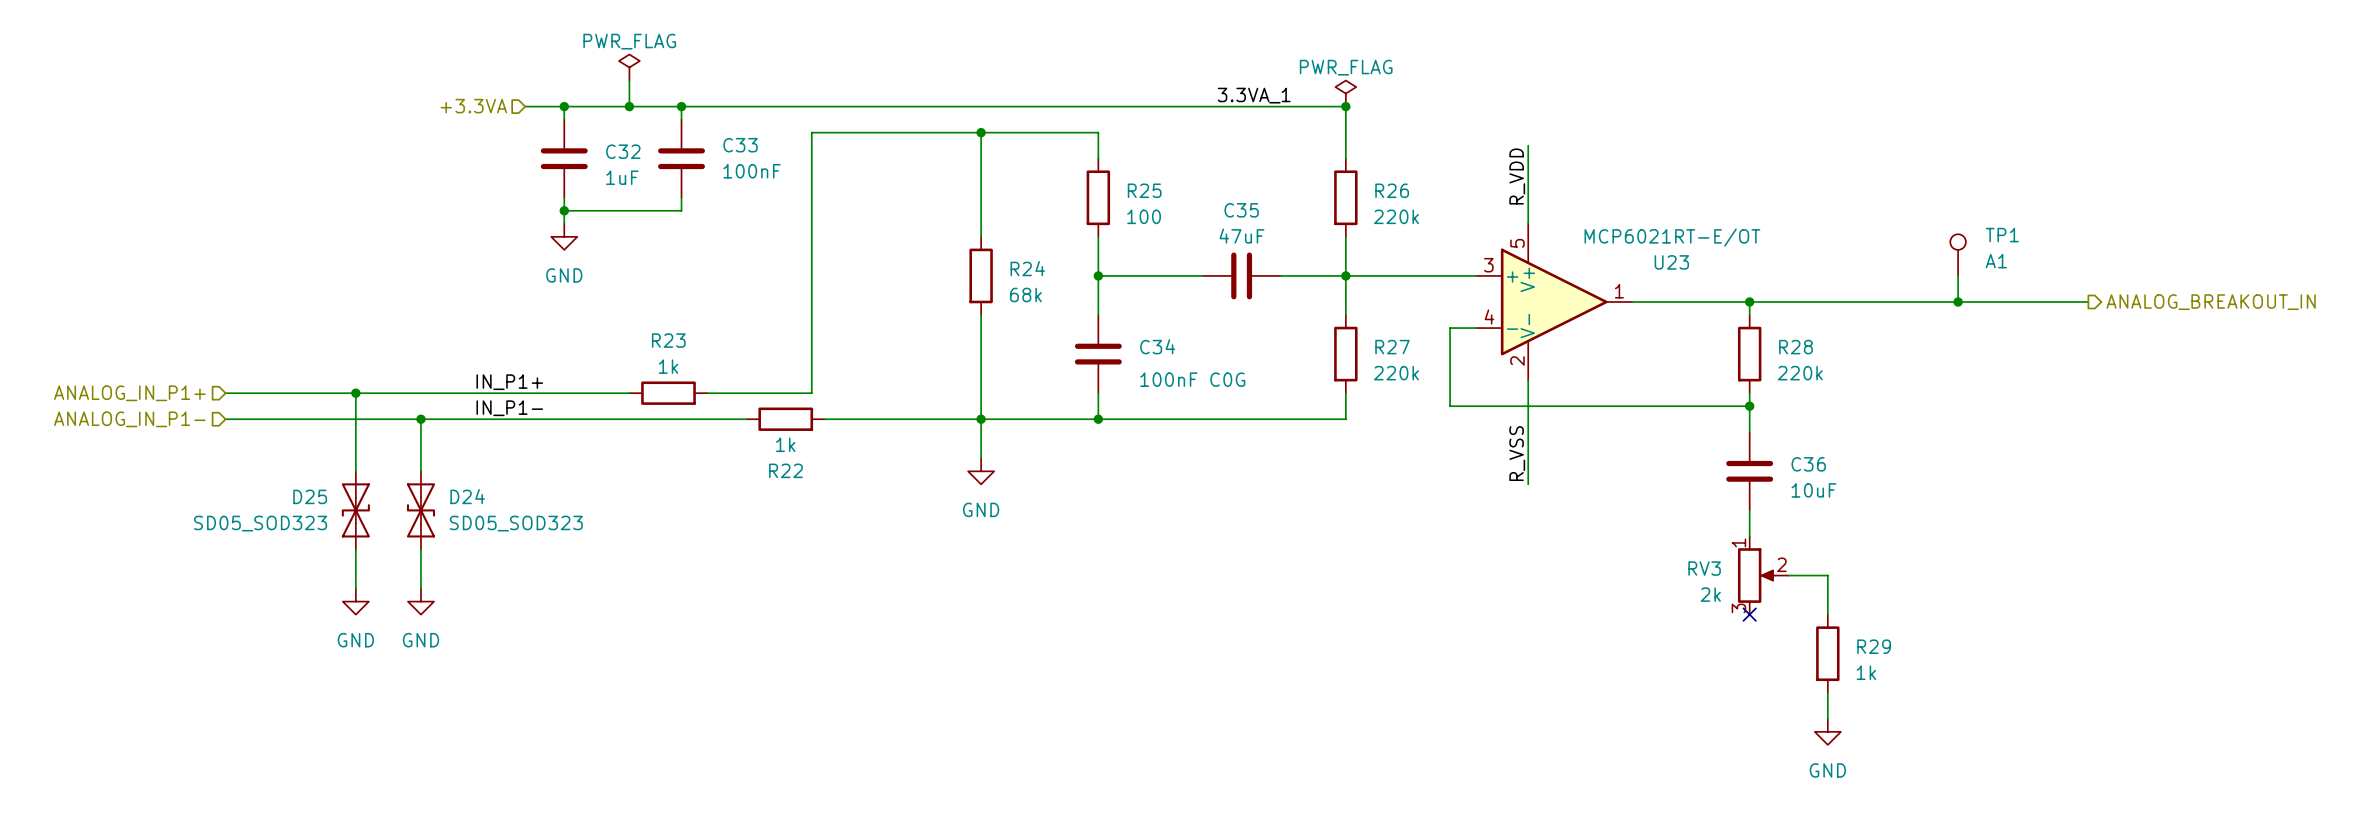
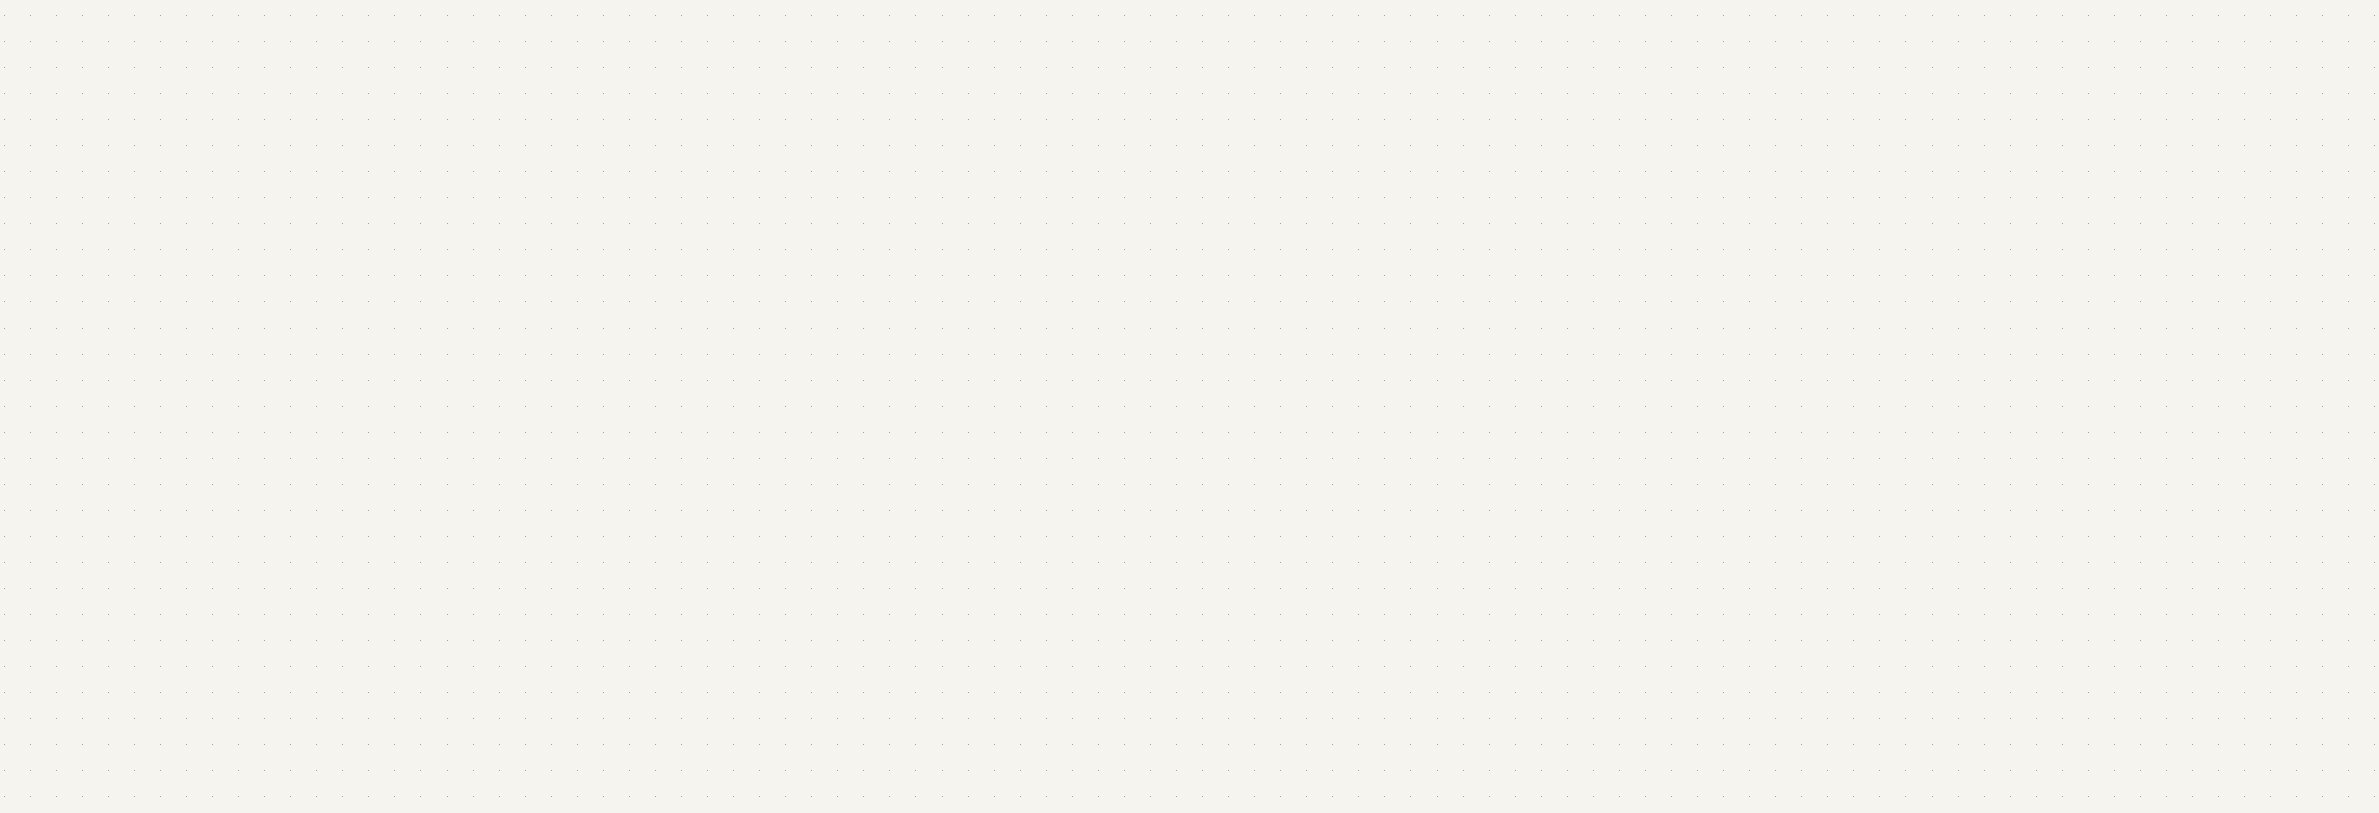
power symbol: PWR_FLAG (629, 67) -> none
wire: (629, 80) (629, 106) -> none
power symbol: PWR_FLAG (1345, 93) -> none
label: 3.3VA_1 (1254, 95) -> none
hierarchical label: +3.3VA (473, 106) -> none
wire: (525, 106) (1345, 106) (1345, 158) -> none
wire: (564, 106) (564, 119) -> none
junction: (564, 106) -> none
junction: (629, 106) -> none
wire: (681, 106) (681, 119) -> none
junction: (681, 106) -> none
junction: (1345, 106) -> none
wire: (981, 132) (981, 236) -> none
junction: (981, 132) -> none
wire: (1528, 145) (1528, 223) -> none
C32: 1uF (564, 158) -> none
C33: 100nF (681, 158) -> none
wire: (1098, 158) (1098, 132) (811, 132) (811, 393) (707, 393) -> none
label: R_VDD (1517, 176) -> none
wire: (564, 197) (564, 223) -> none
wire: (681, 197) (681, 210) (564, 210) -> none
R25: 100 (1098, 197) -> none
R26: 220k (1345, 197) -> none
junction: (564, 210) -> none
power symbol: GND (564, 236) -> none
wire: (1098, 236) (1098, 315) -> none
wire: (1345, 236) (1345, 315) -> none
TP1: A1 (1958, 255) -> none
R24: 68k (981, 275) -> none
wire: (1098, 275) (1202, 275) -> none
junction: (1098, 275) -> none
C35: 47uF (1241, 275) -> none
wire: (1280, 275) (1476, 275) -> none
junction: (1345, 275) -> none
wire: (1958, 275) (1958, 301) -> none
U23: MCP6021RT-E/OT (1554, 301) -> none
wire: (1632, 301) (2088, 301) -> none
wire: (1749, 301) (1749, 315) -> none
junction: (1749, 301) -> none
junction: (1958, 301) -> none
hierarchical label: ANALOG_BREAKOUT_IN (2211, 302) -> none
wire: (981, 315) (981, 458) -> none
wire: (1476, 328) (1450, 328) (1450, 406) (1749, 406) -> none
C34: 100nF C0G (1098, 354) -> none
R27: 220k (1345, 354) -> none
R28: 220k (1749, 354) -> none
wire: (1528, 380) (1528, 484) -> none
label: IN_P1+ (509, 382) -> none
hierarchical label: ANALOG_IN_P1+ (129, 393) -> none
wire: (225, 393) (629, 393) -> none
wire: (355, 393) (355, 471) -> none
junction: (355, 393) -> none
R23: 1k (668, 393) -> none
wire: (1098, 393) (1098, 419) -> none
wire: (1345, 393) (1345, 419) (824, 419) -> none
wire: (1749, 393) (1749, 432) -> none
junction: (1749, 406) -> none
label: IN_P1- (509, 408) -> none
hierarchical label: ANALOG_IN_P1- (129, 419) -> none
wire: (225, 419) (746, 419) -> none
wire: (420, 419) (420, 471) -> none
junction: (420, 419) -> none
R22: 1k (785, 419) -> none
junction: (981, 419) -> none
junction: (1098, 419) -> none
label: R_VSS (1517, 453) -> none
power symbol: GND (981, 471) -> none
C36: 10uF (1749, 471) -> none
D25: SD05_SOD323 (355, 510) -> none
D24: SD05_SOD323 (420, 510) -> none
wire: (1749, 510) (1749, 536) -> none
wire: (355, 549) (355, 588) -> none
wire: (420, 549) (420, 588) -> none
RV3: 2k (1763, 575) -> none
wire: (1788, 575) (1827, 575) (1827, 614) -> none
power symbol: GND (355, 601) -> none
power symbol: GND (420, 601) -> none
no-connect mark: (1749, 614) -> none
R29: 1k (1827, 653) -> none
wire: (1827, 692) (1827, 718) -> none
power symbol: GND (1827, 731) -> none

